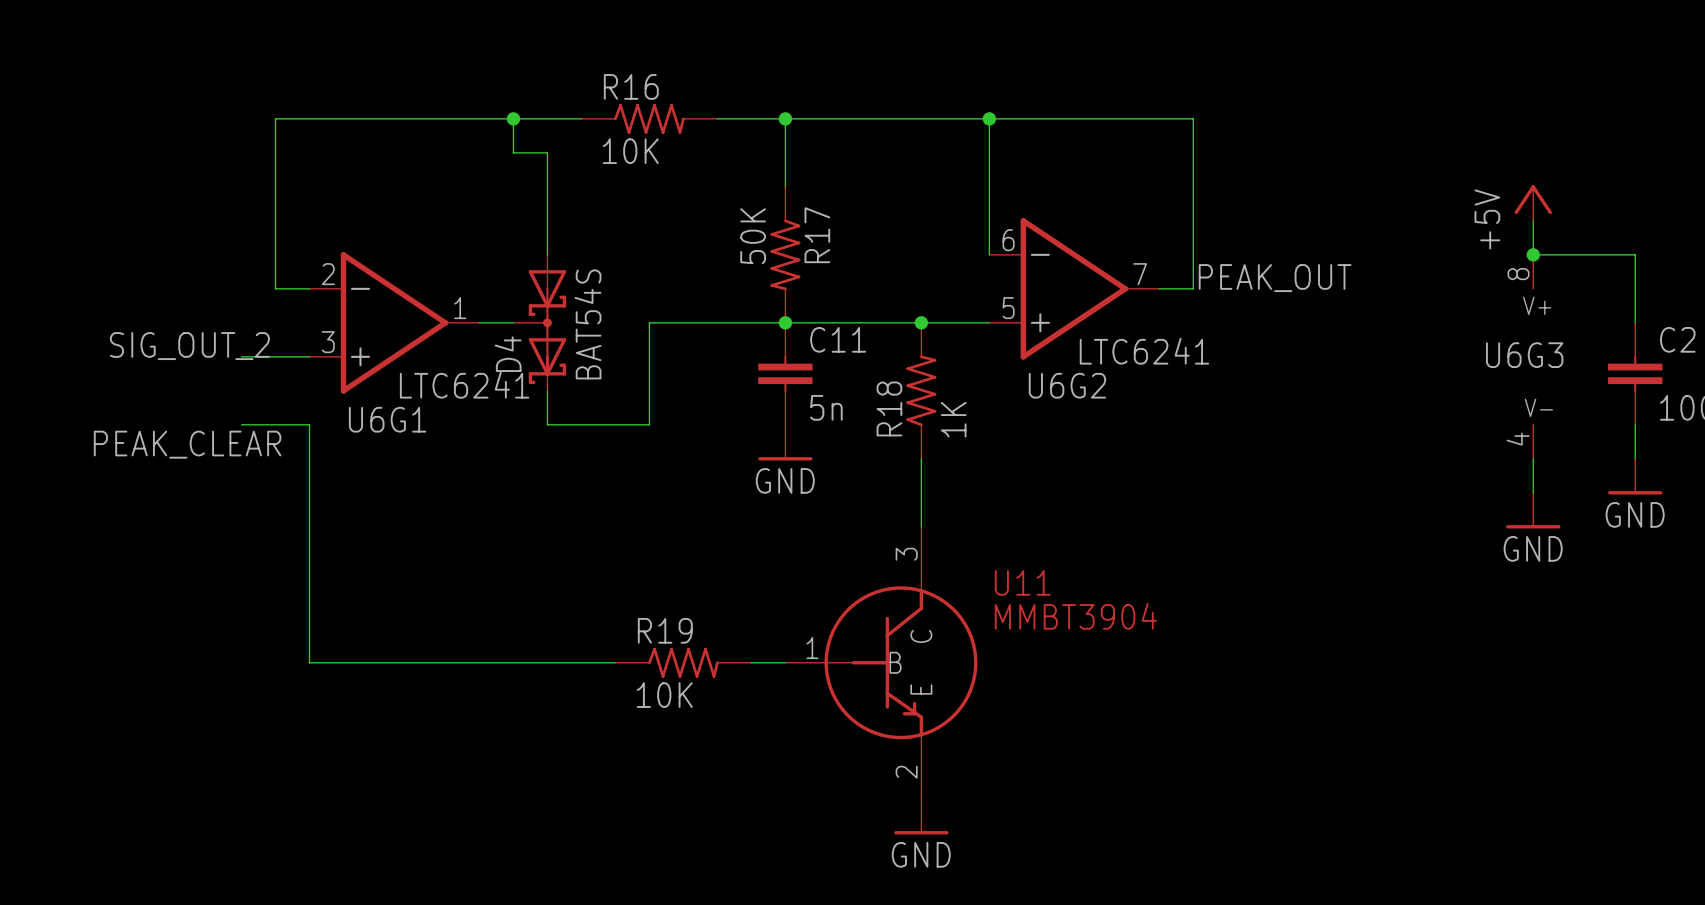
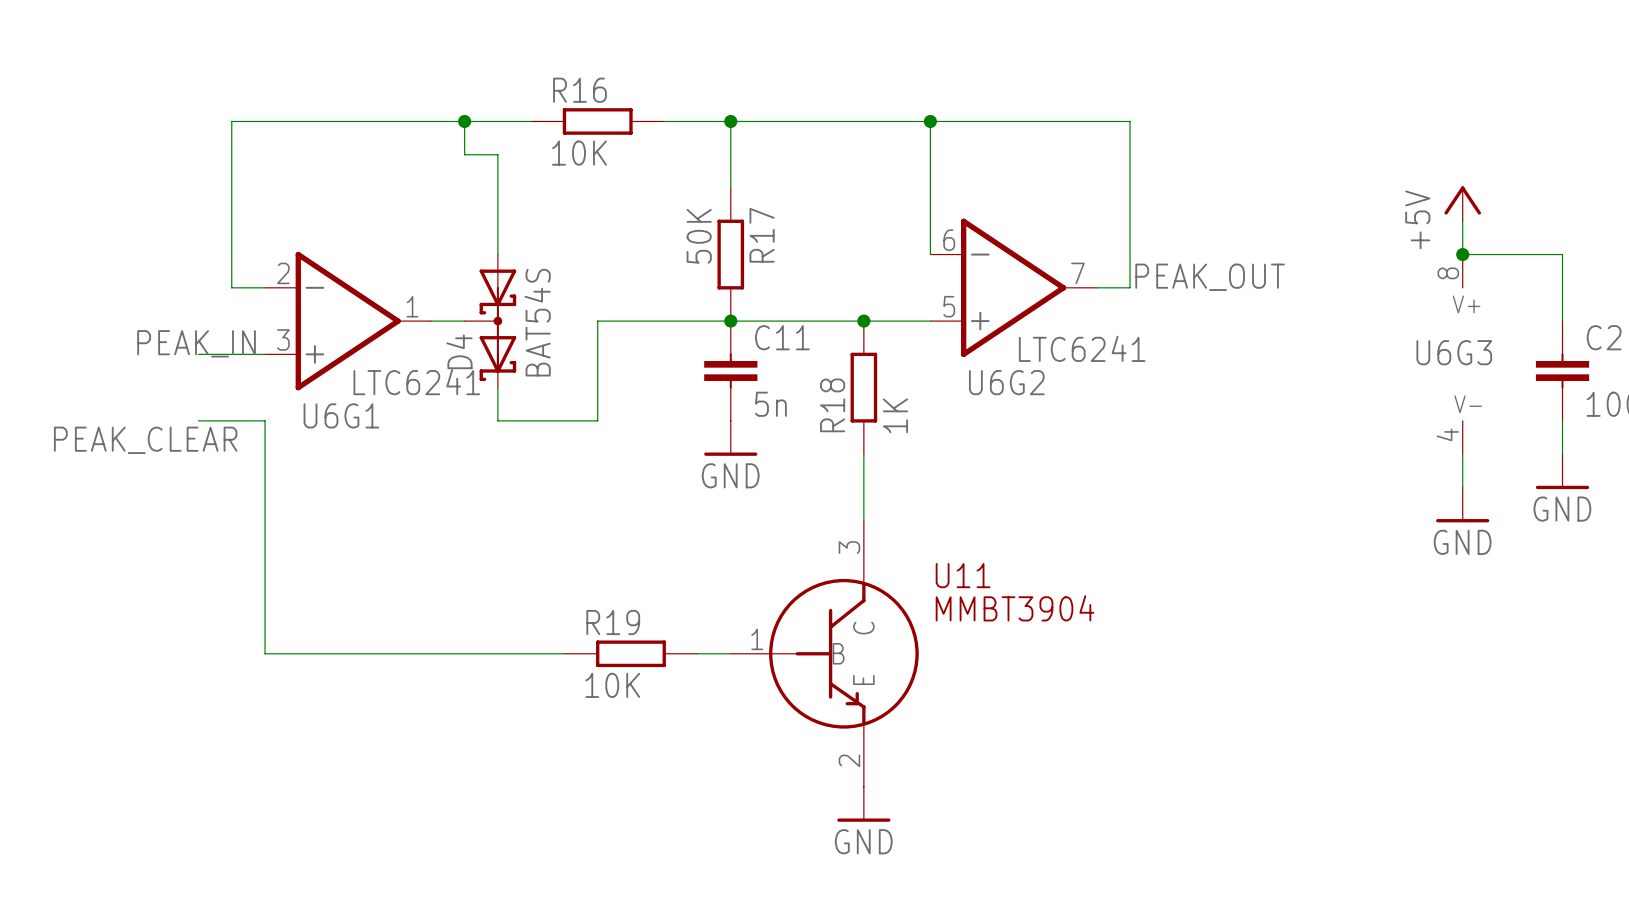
R16 symbol: [581, 103, 718, 134] -> [531, 108, 665, 135]
R17 symbol: [770, 186, 801, 323] -> [717, 188, 745, 322]
R18 symbol: [906, 322, 937, 459] -> [850, 321, 878, 455]
label: SIG_OUT_2 (189, 346) -> none
label: none -> PEAK_IN (196, 343)
R19 symbol: [615, 647, 752, 678] -> [564, 640, 698, 668]

